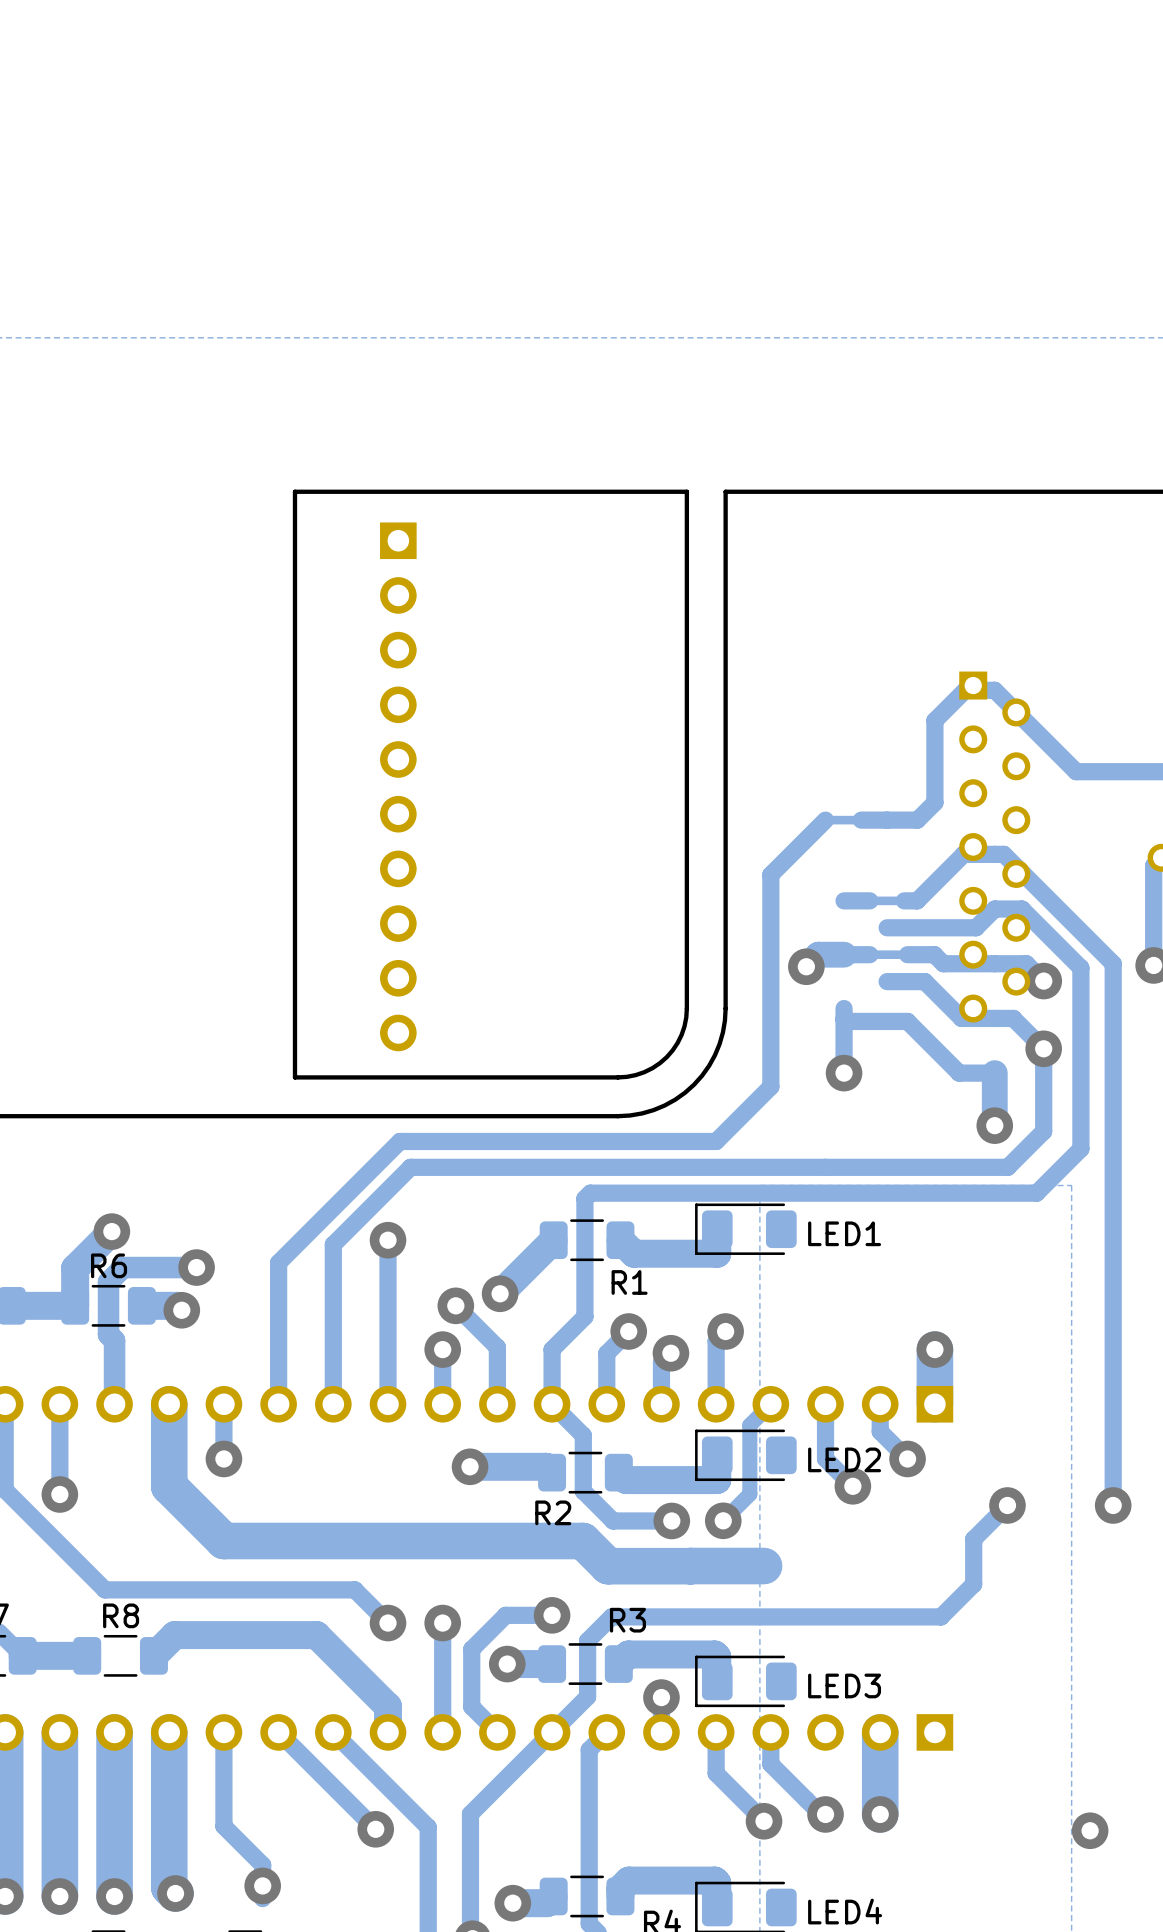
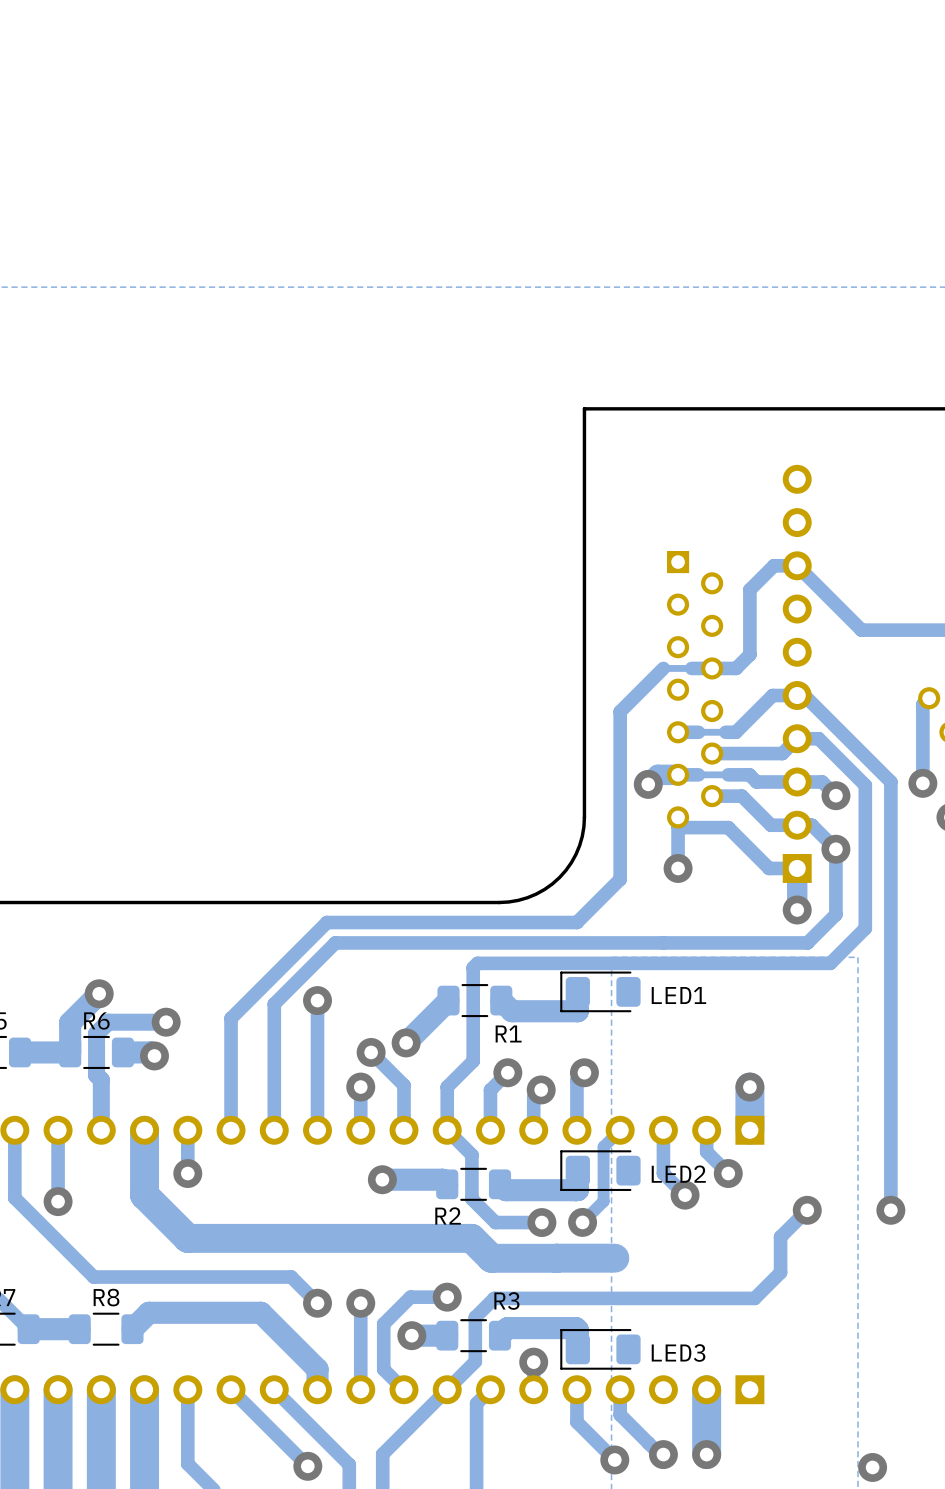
board edge: (686, 491) (294, 491) (294, 1077) (626, 1076) (652, 1068) (672, 1050) (681, 1034) (686, 1008) (686, 491) -> none
part footprint: [959, 671, 1031, 1023] -> [782, 464, 812, 883]
part: (398, 786) -> none
part: none -> (695, 689)

